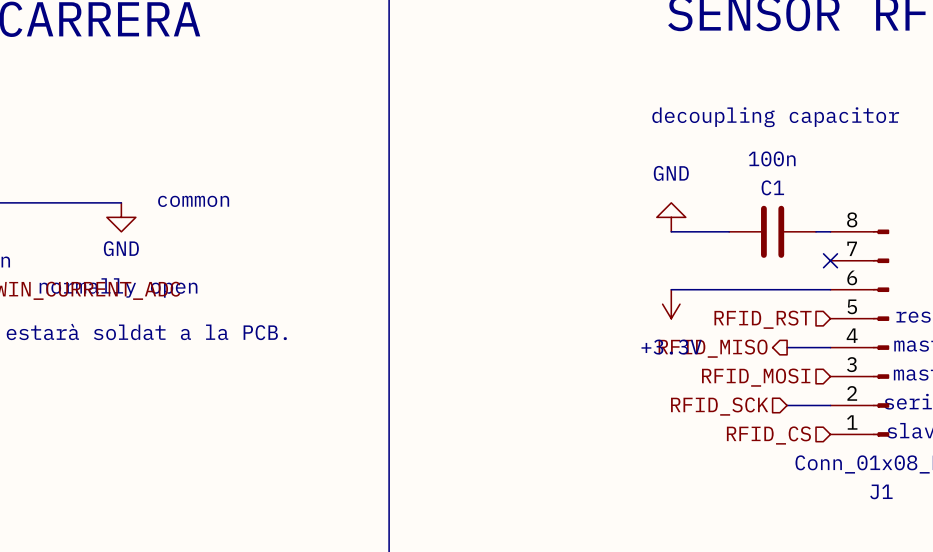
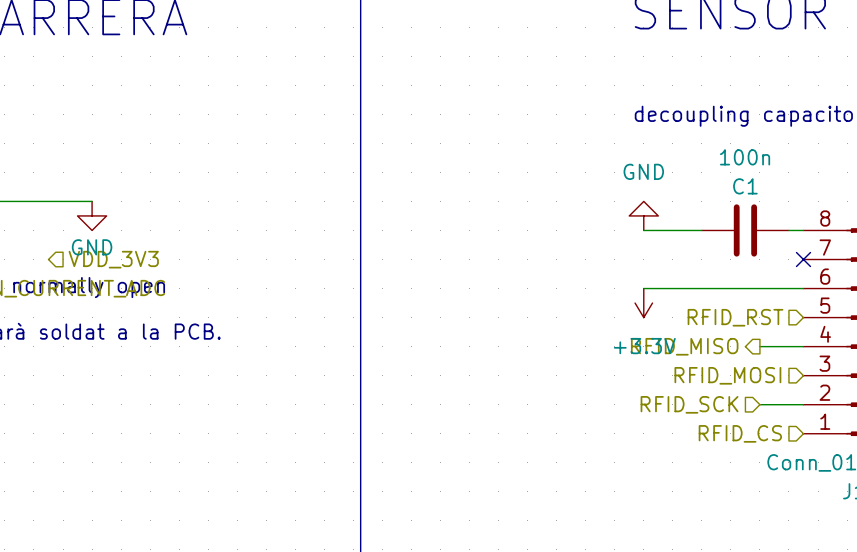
text: common (193, 201) -> none
hierarchical label: none -> VDD_3V3 (113, 259)

